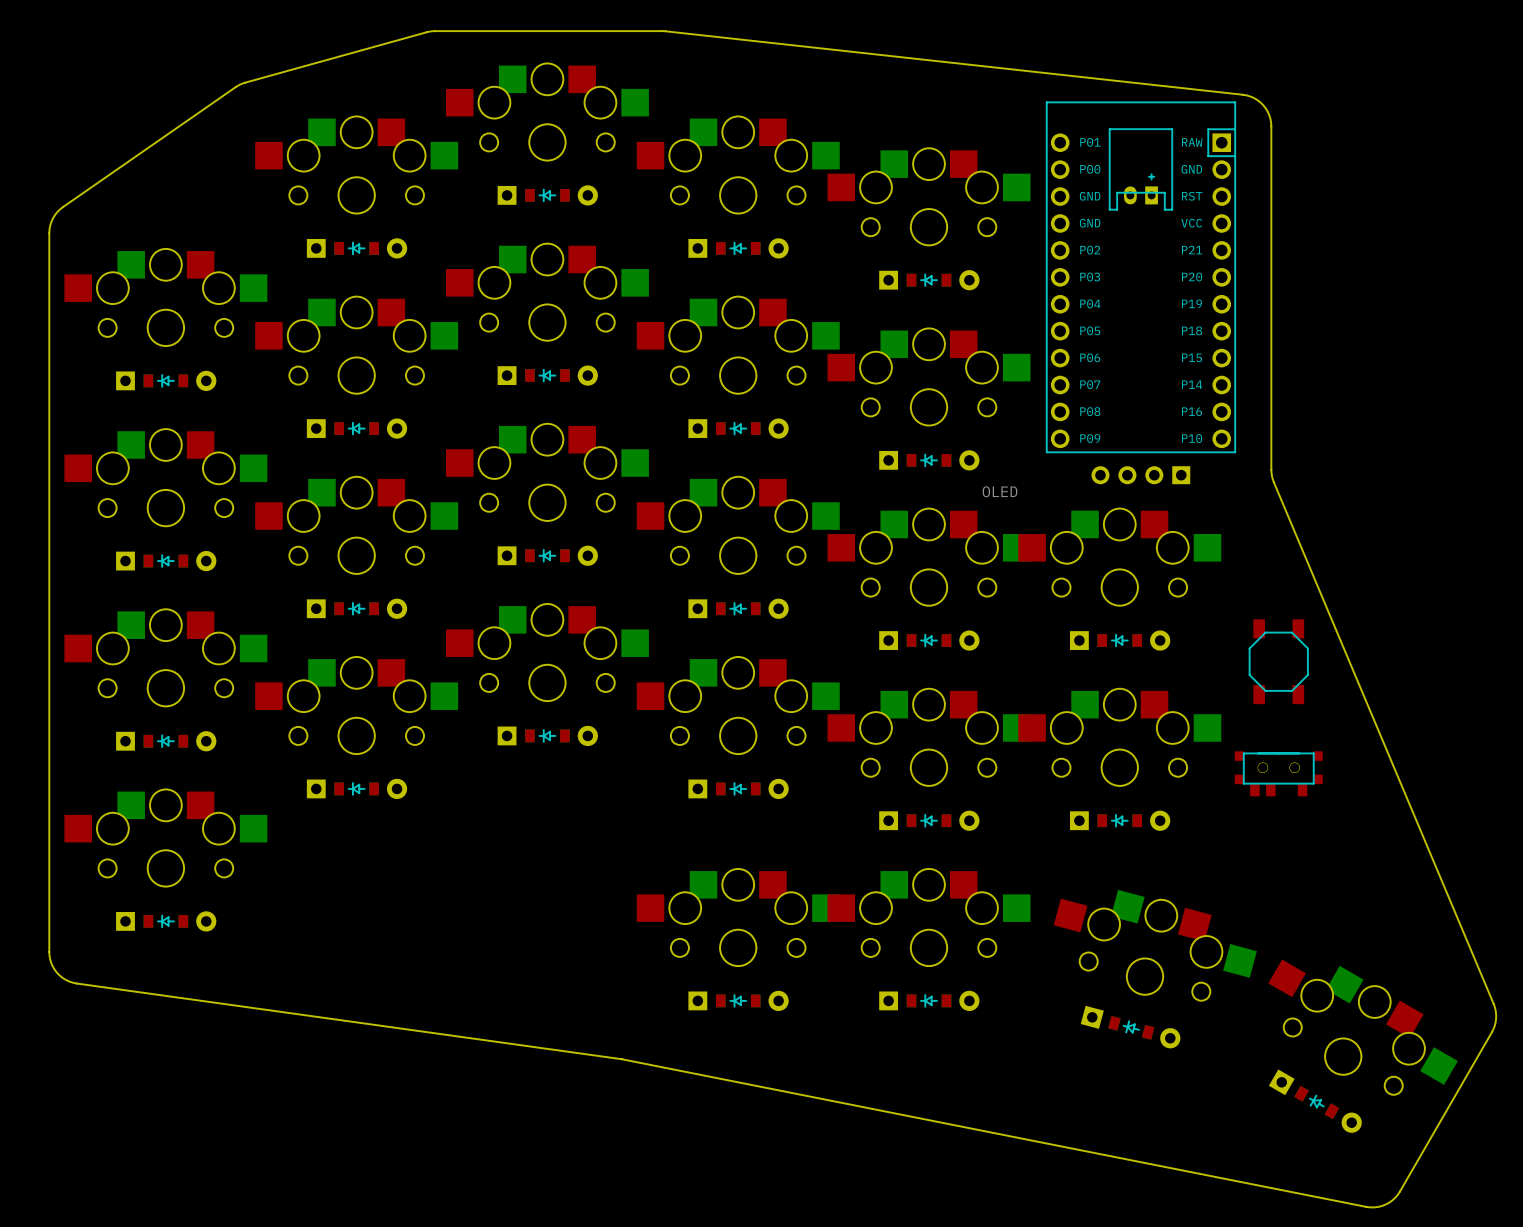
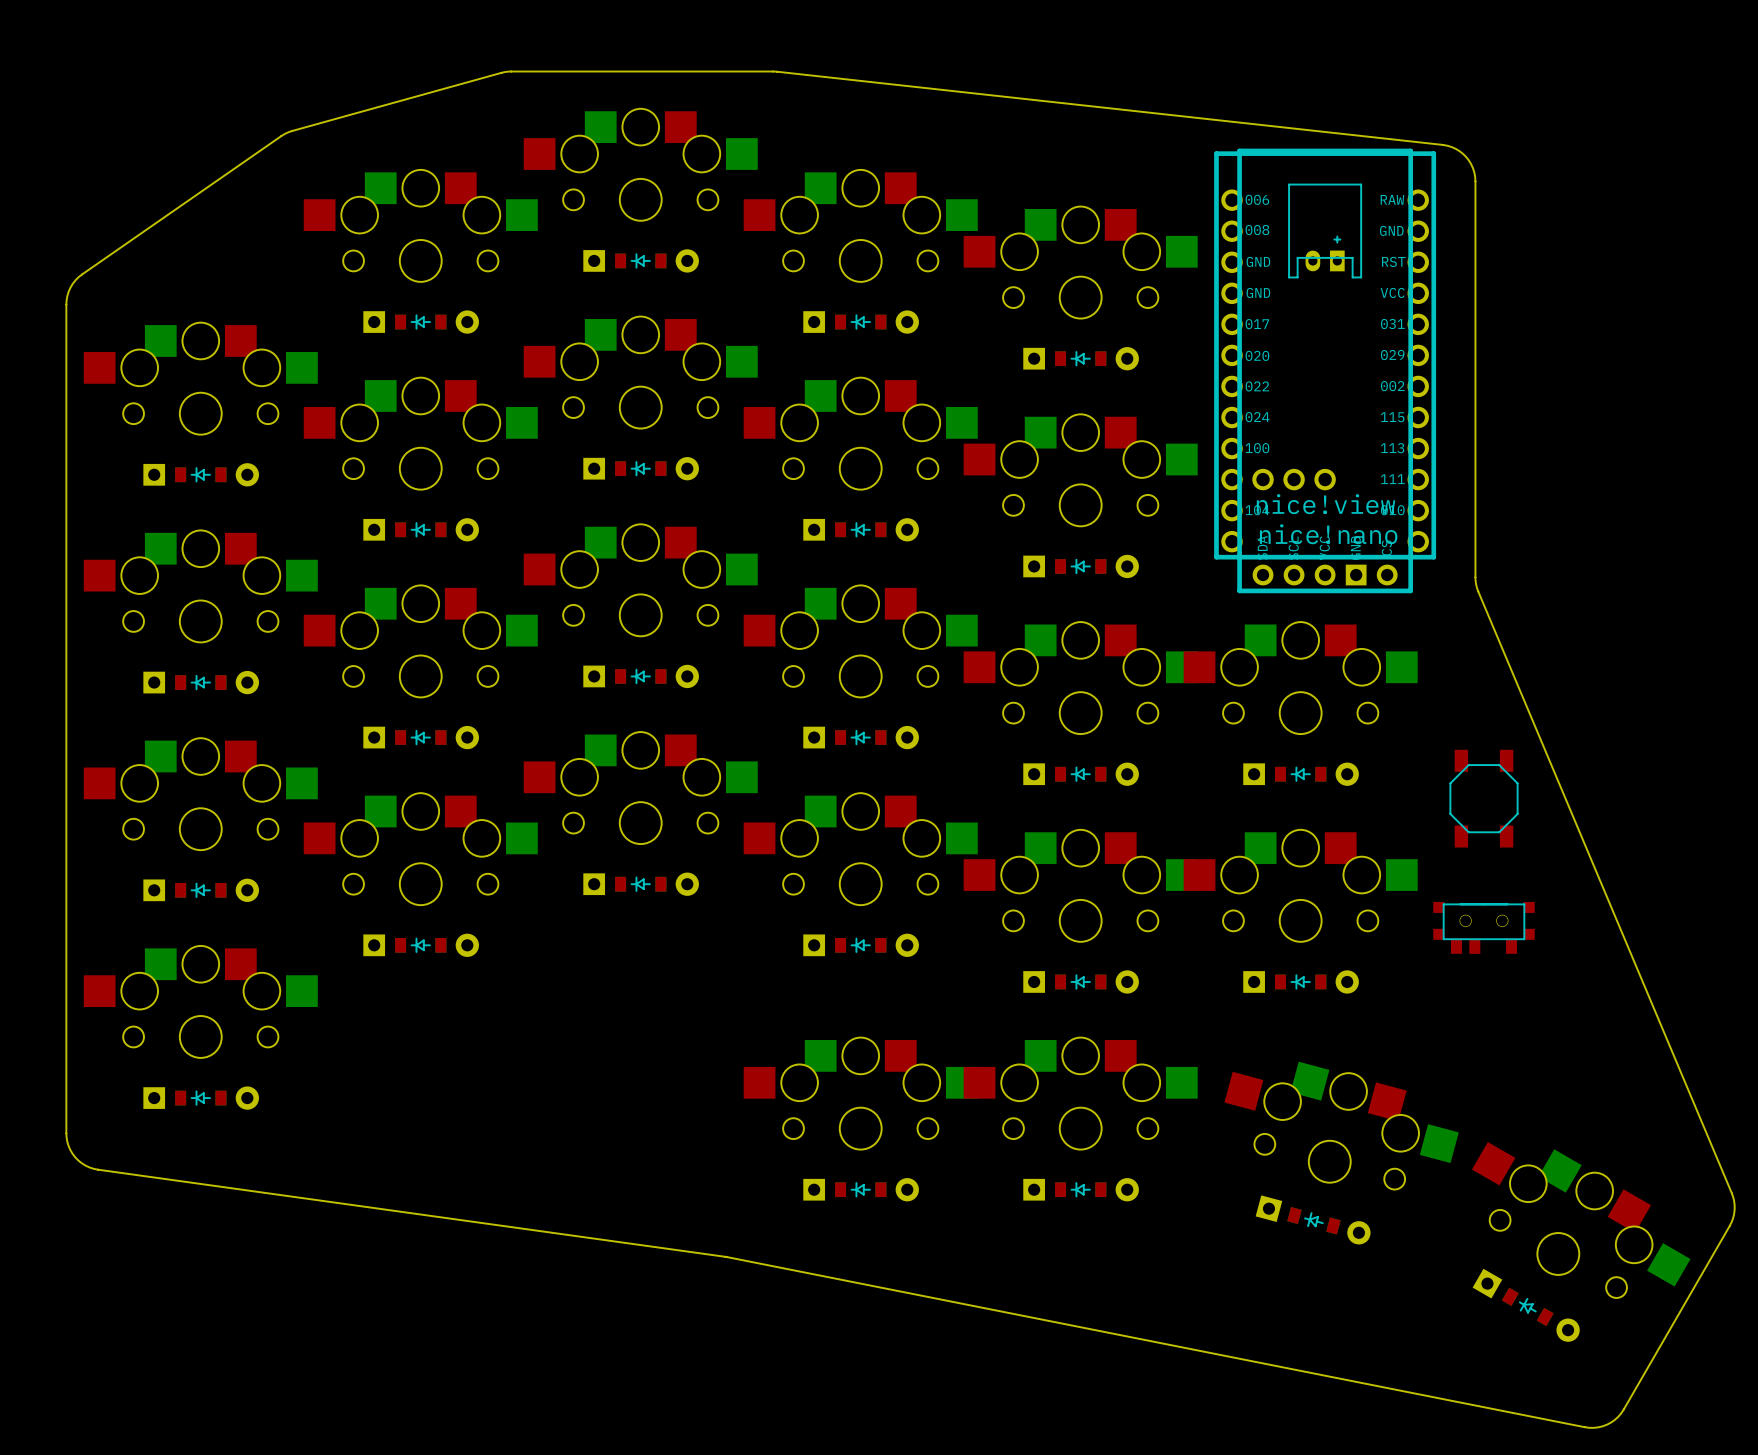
part footprint: [1045, 101, 1236, 454] -> [1214, 151, 1437, 560]
part: none -> (1325, 370)
part: OLED (1140, 475) -> none

